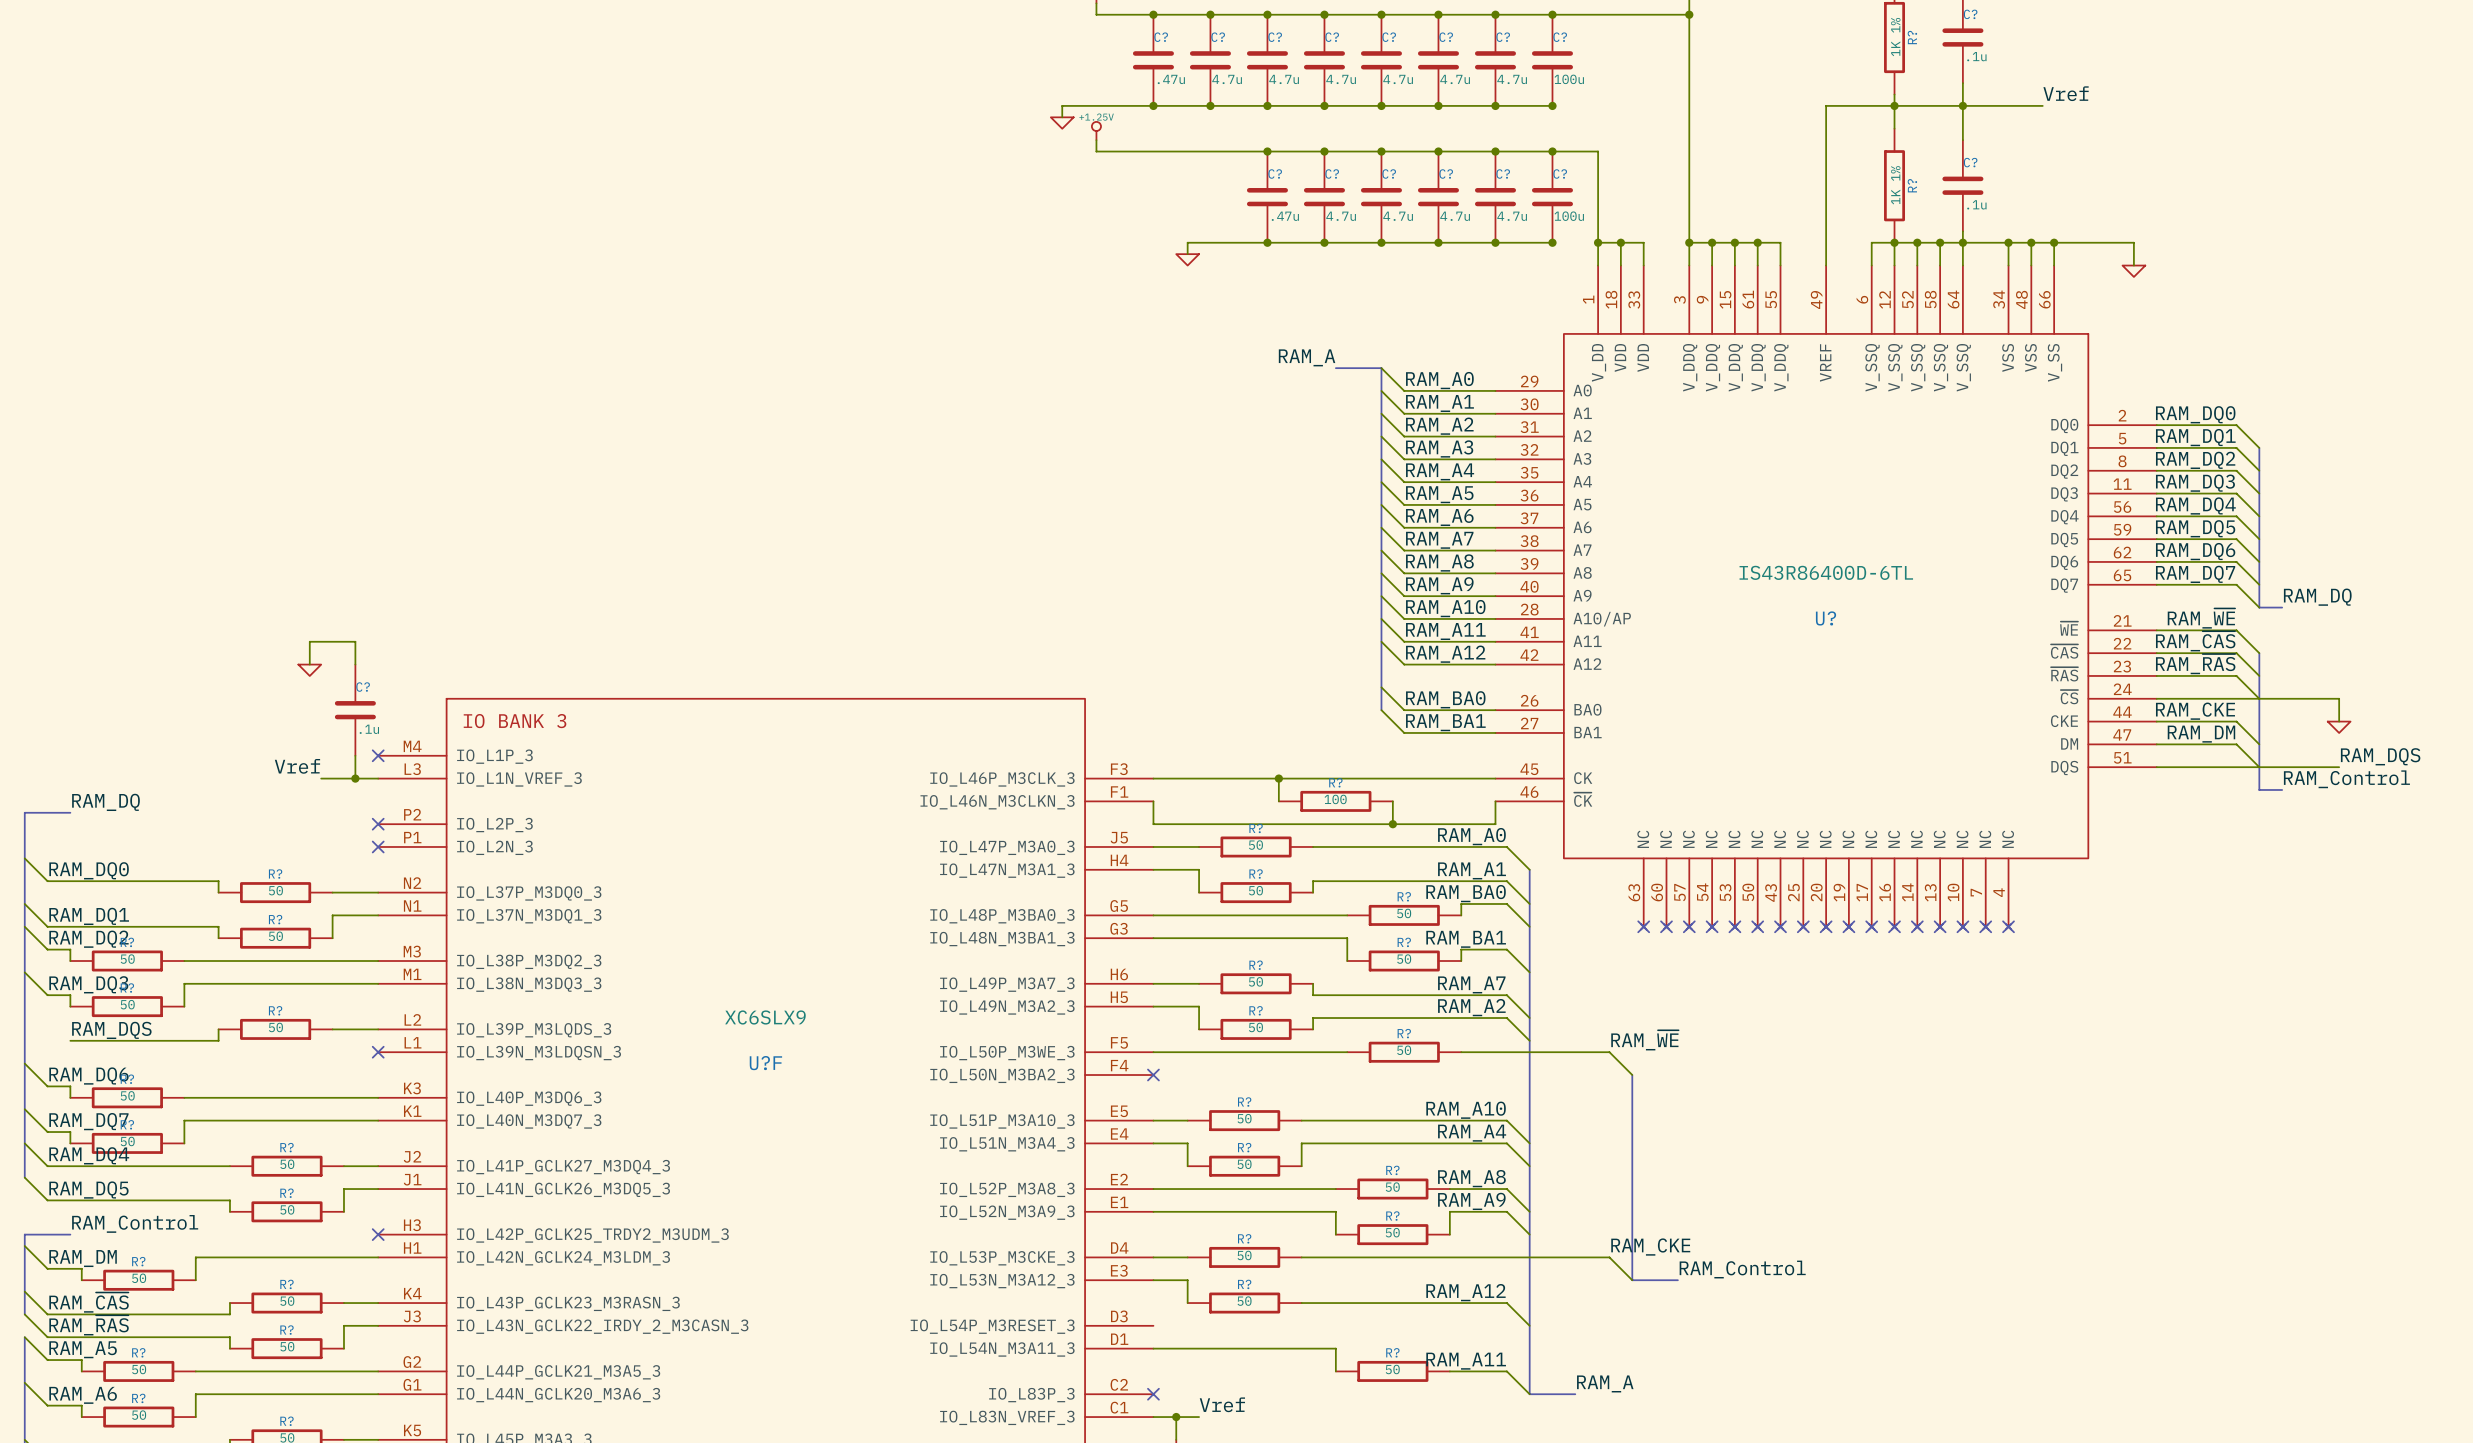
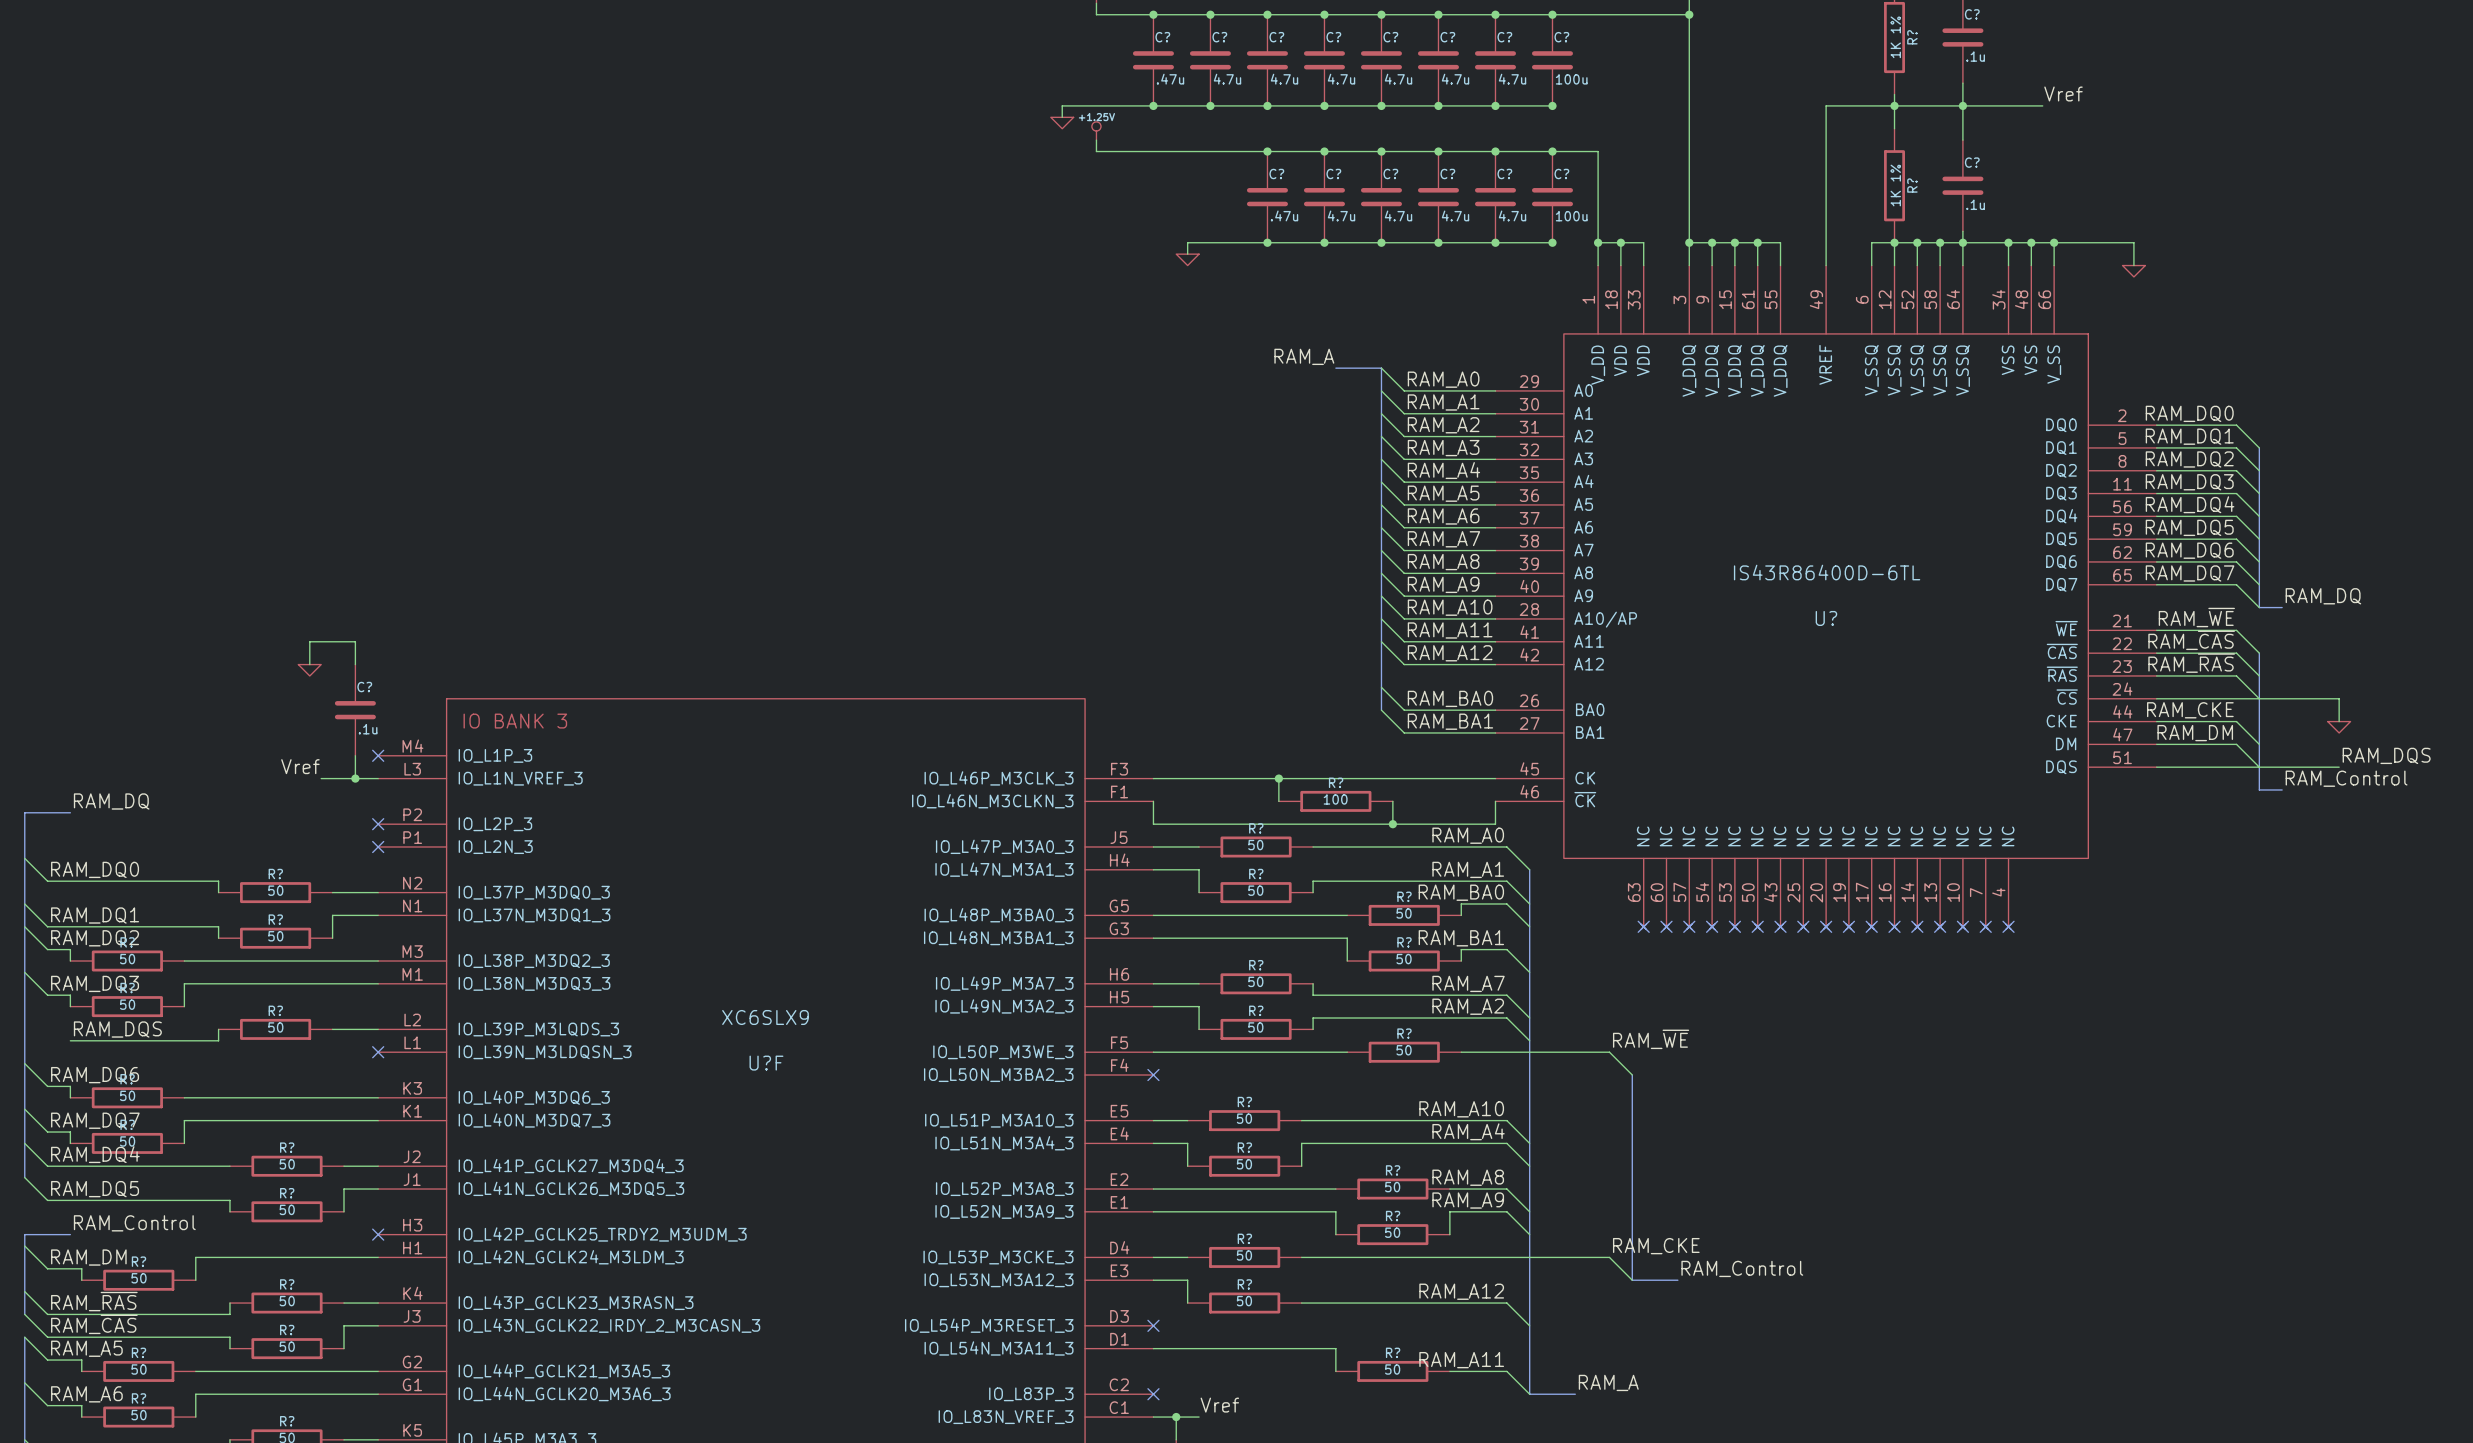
label: RAM_~{CAS} (89, 1302) -> RAM_~{RAS} (94, 1301)
label: RAM_~{RAS} (89, 1325) -> RAM_~{CAS} (94, 1324)
no-connect mark: none -> (1153, 1325)

